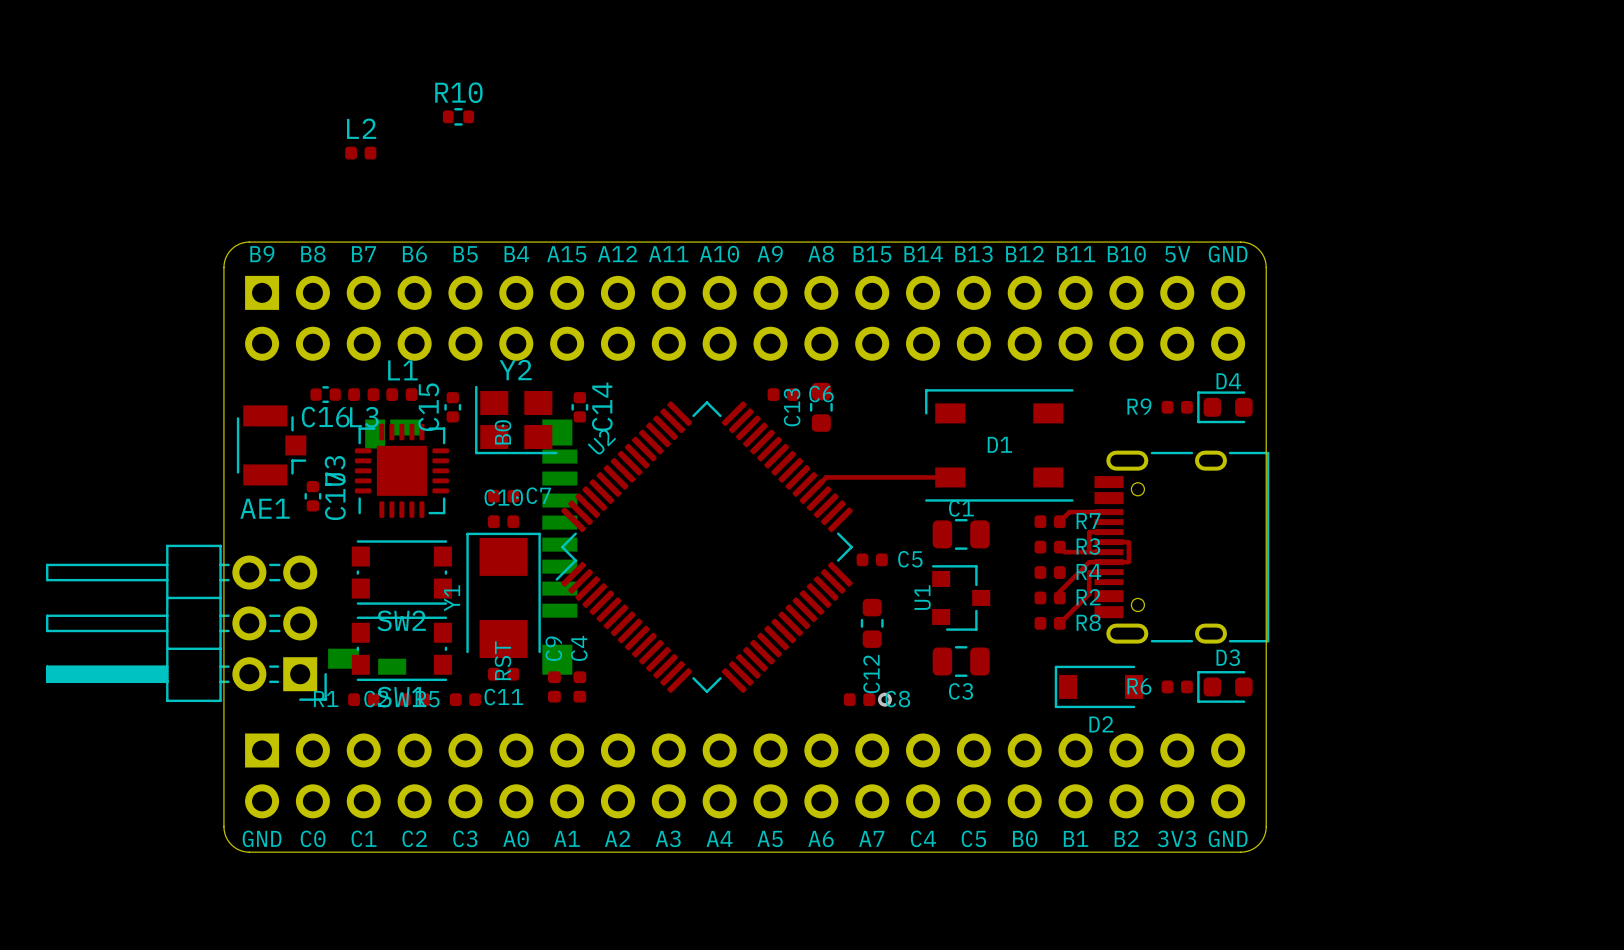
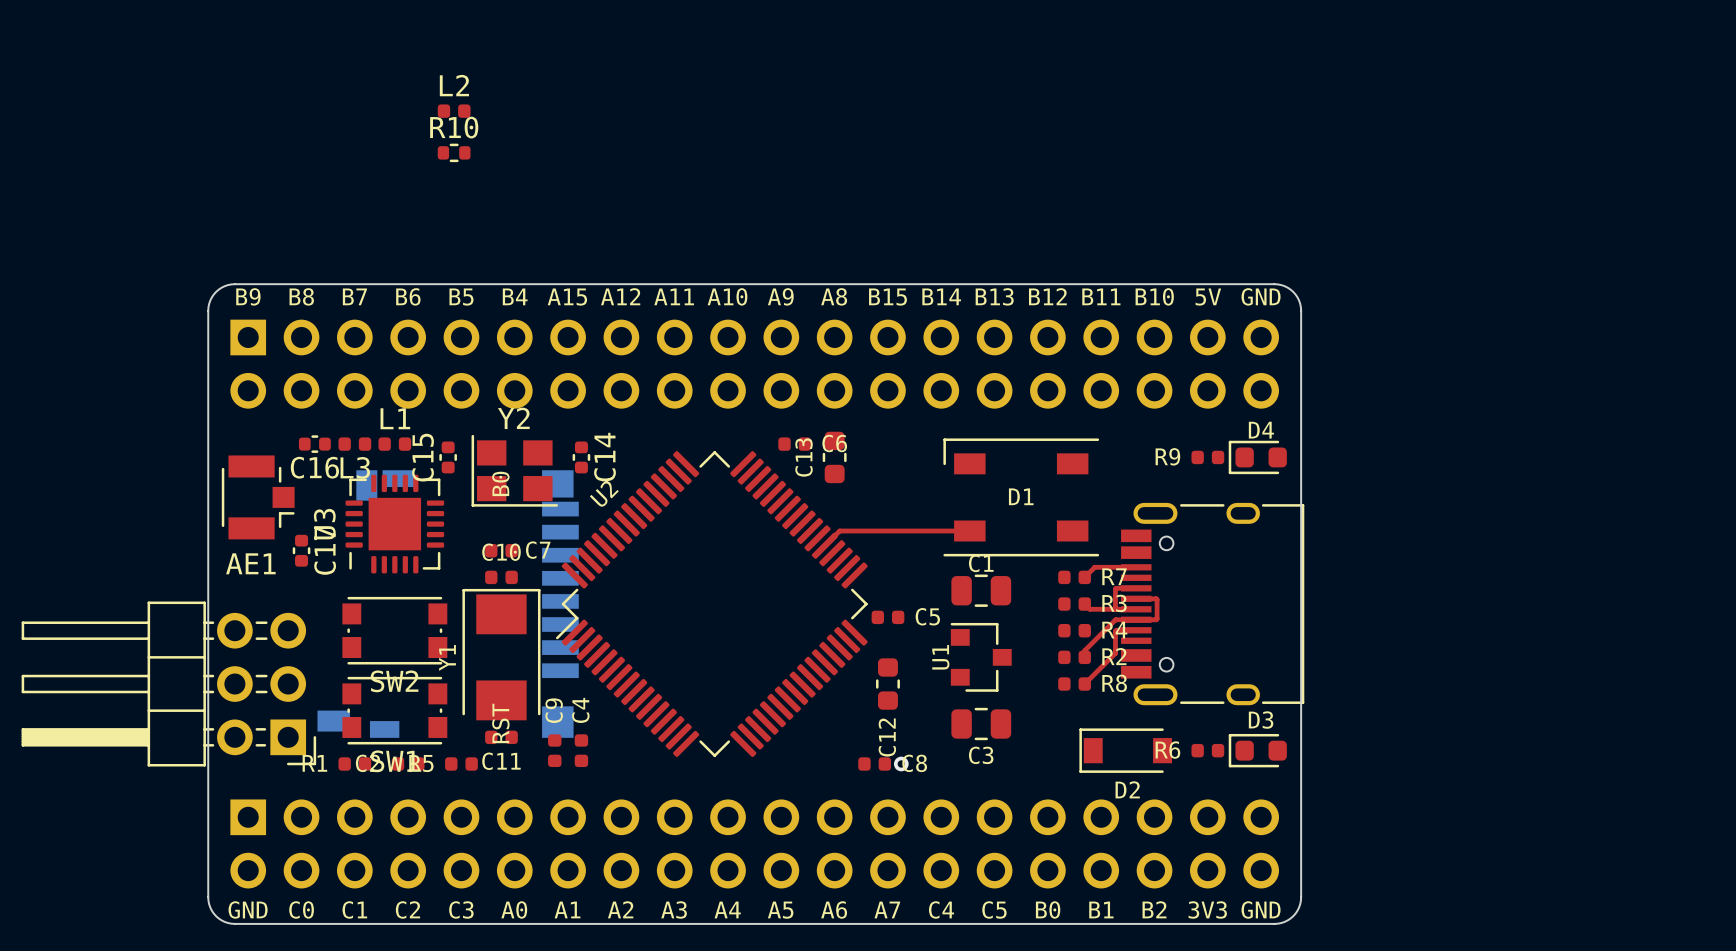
L2 position: (360, 153) -> (454, 111)

